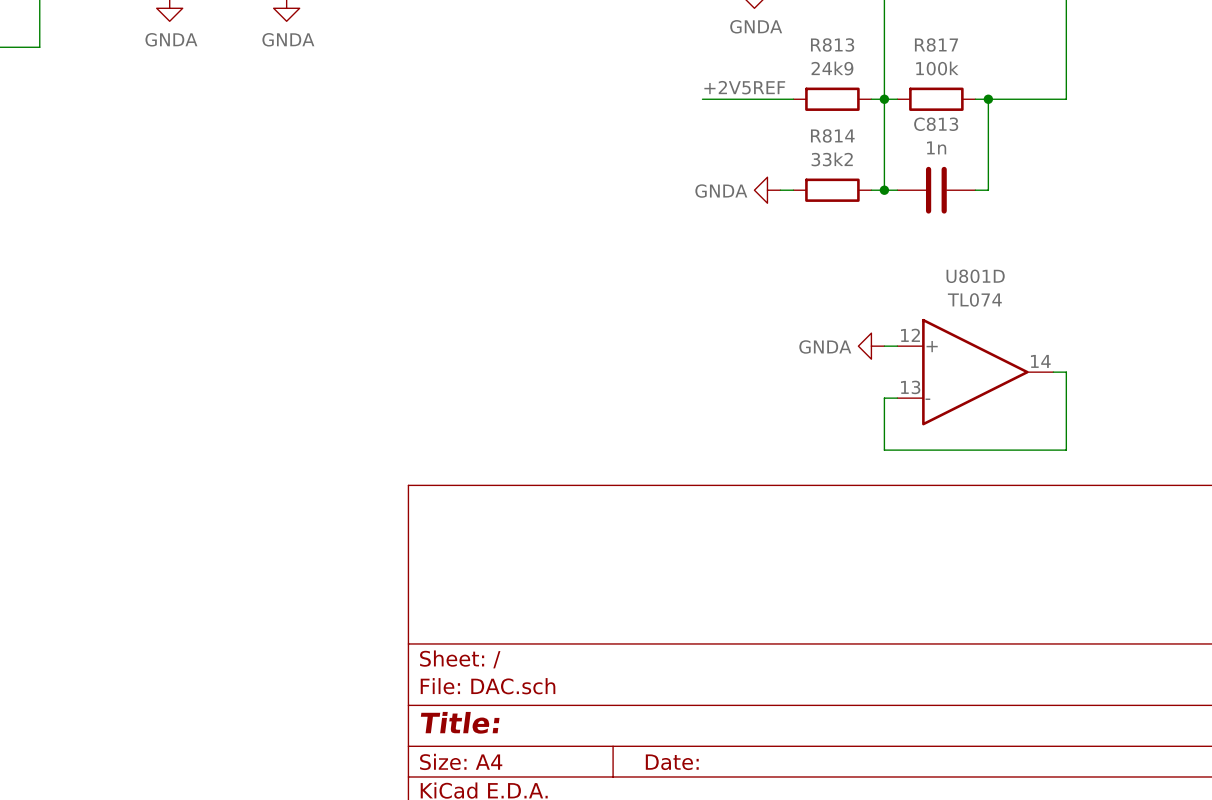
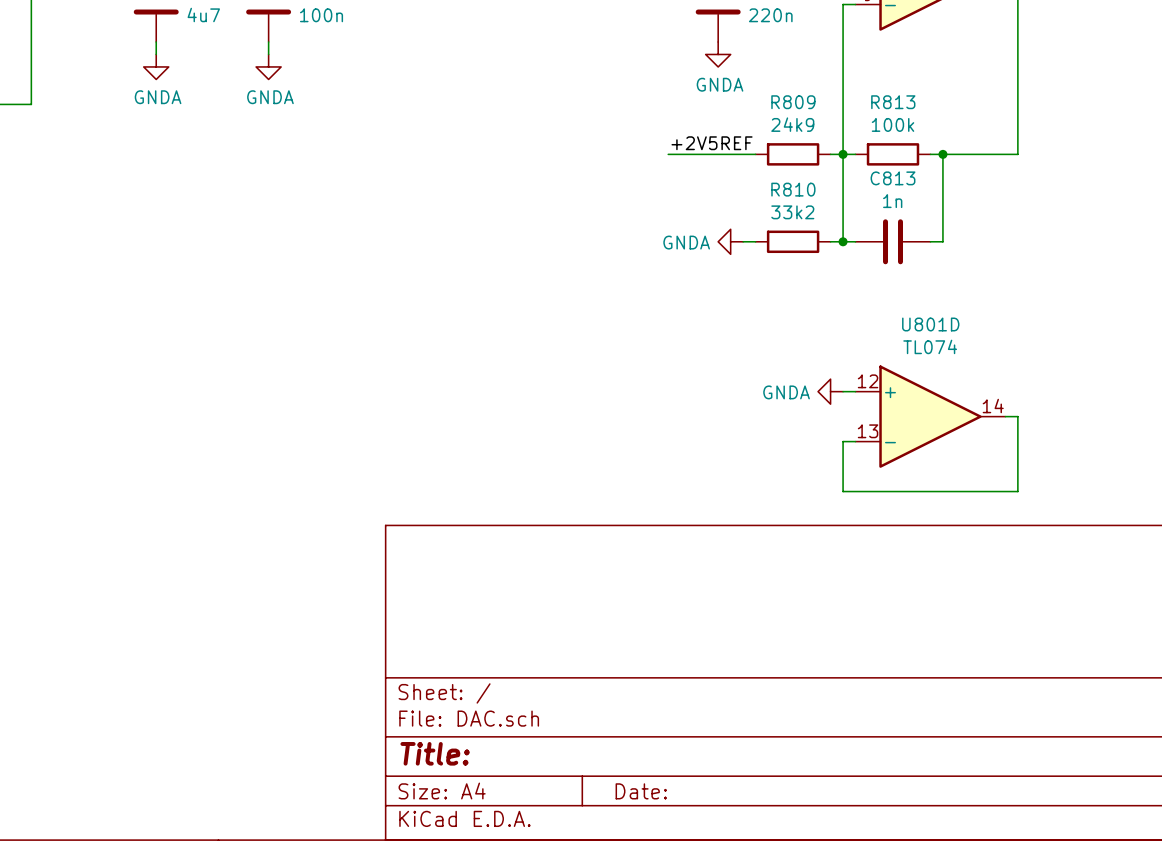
R813 name: R813 (832, 44) -> R809 (793, 102)
R817 name: R817 (936, 44) -> R813 (893, 102)
R814 name: R814 (832, 135) -> R810 (793, 189)

